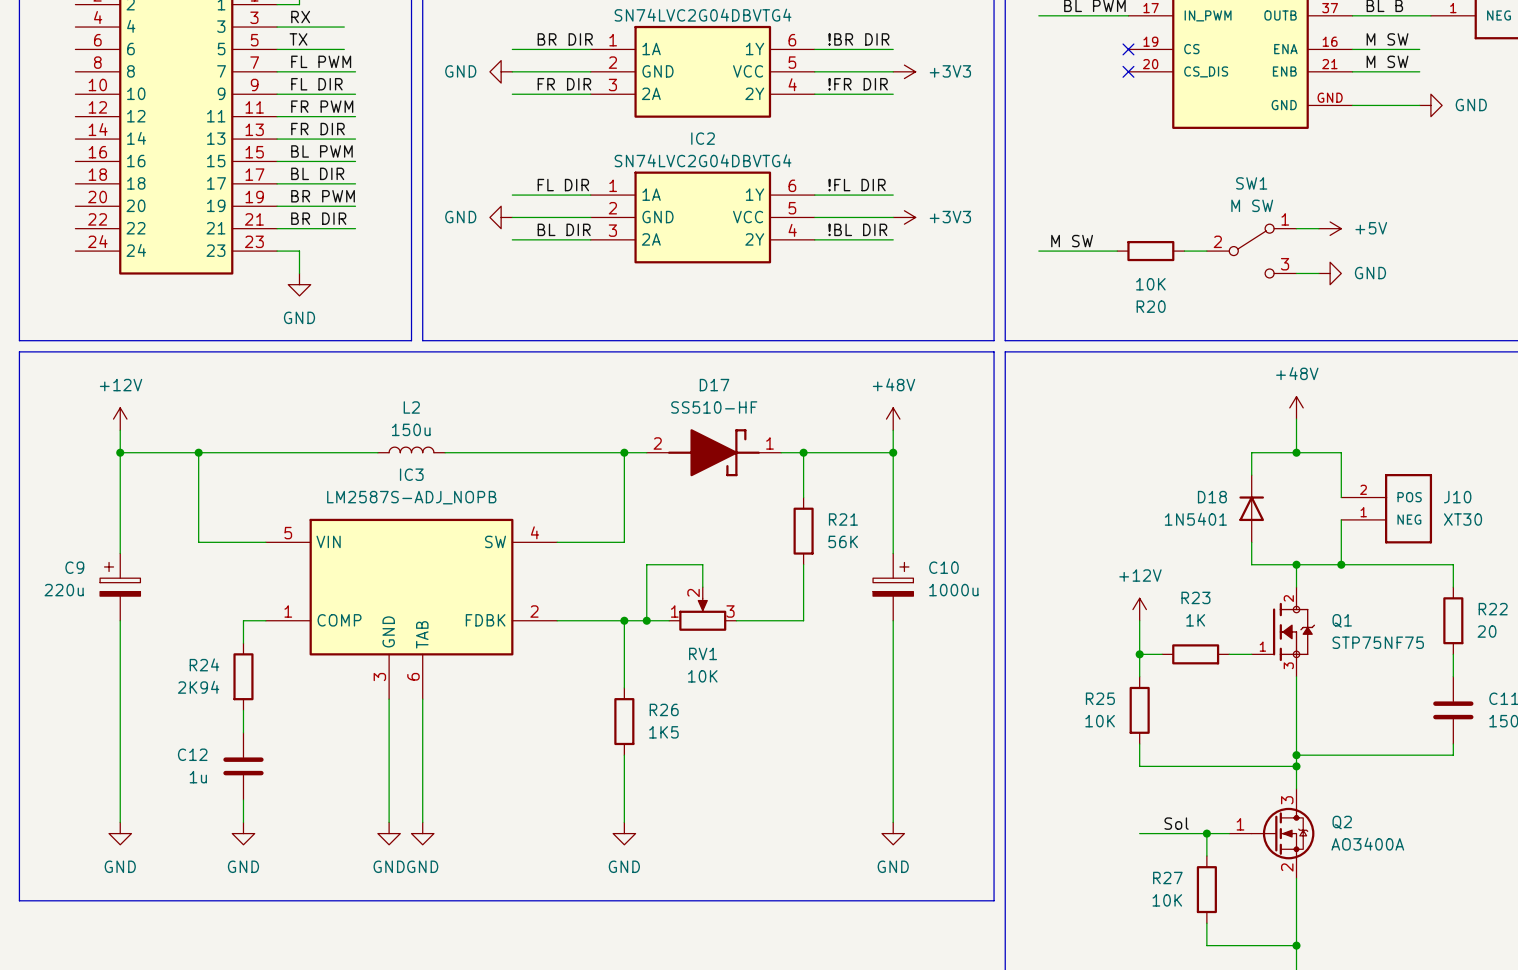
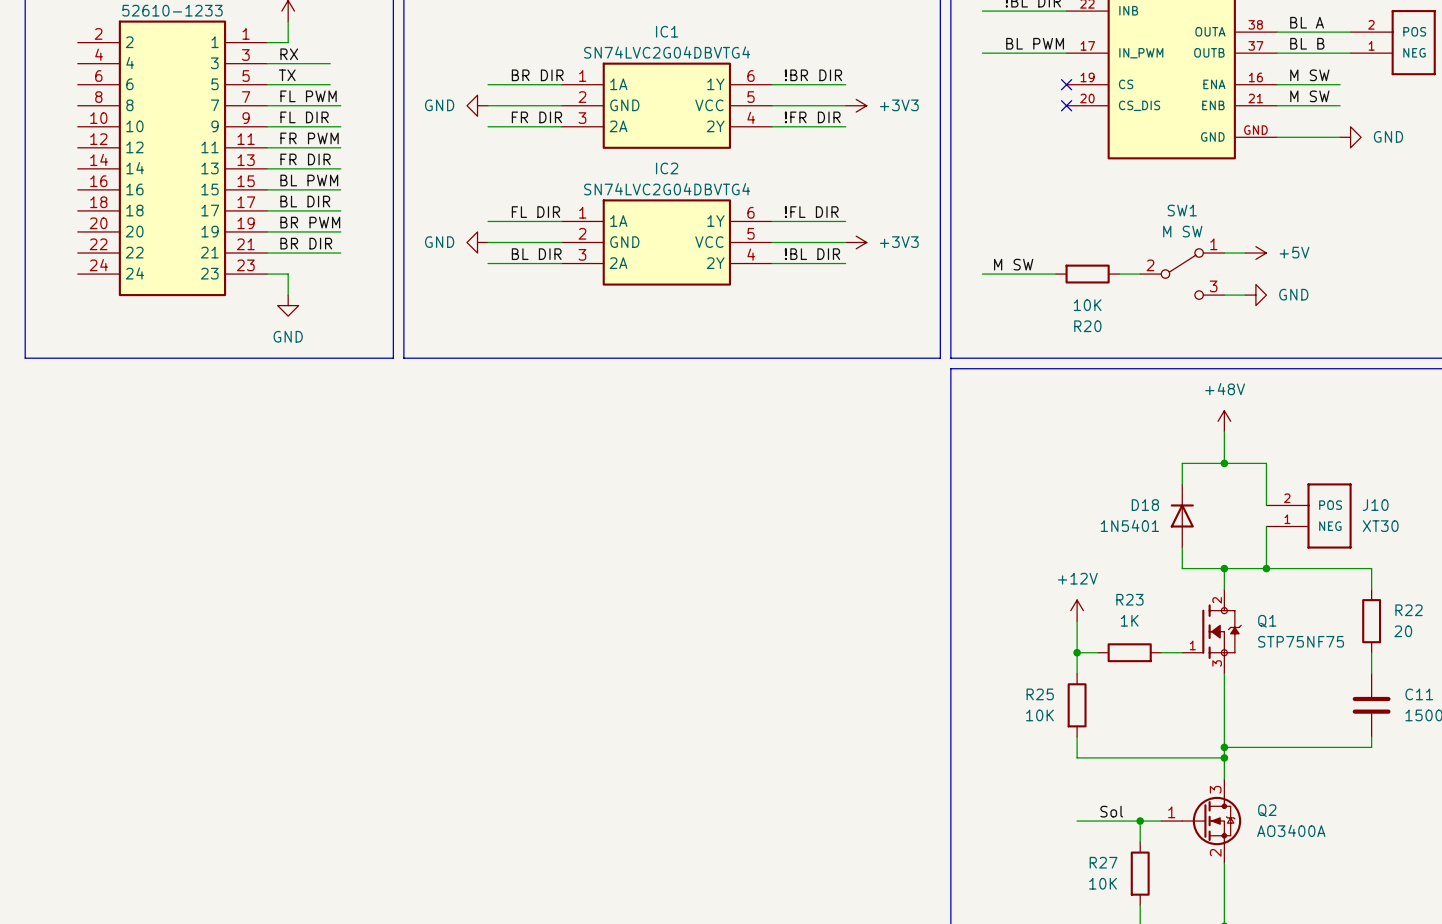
line: (19, 351) (994, 351) (994, 900) (19, 900) (19, 351) -> none
power symbol: +12V (120, 419) -> none
power symbol: +48V (893, 419) -> none
wire: (120, 430) (120, 553) -> none
wire: (893, 430) (893, 553) -> none
L2: 150u (411, 449) -> none
wire: (120, 452) (377, 452) -> none
junction: (120, 452) -> none
wire: (198, 452) (198, 542) (265, 542) -> none
junction: (198, 452) -> none
wire: (445, 452) (646, 452) -> none
wire: (624, 452) (624, 542) (557, 542) -> none
junction: (624, 452) -> none
D17: SS510-HF (713, 452) -> none
wire: (781, 452) (893, 452) -> none
wire: (803, 452) (803, 497) -> none
junction: (803, 452) -> none
junction: (893, 452) -> none
R21: 56K (803, 531) -> none
wire: (803, 564) (803, 620) (736, 620) -> none
C9: 220u (120, 587) -> none
wire: (702, 587) (702, 564) (646, 564) (646, 620) -> none
C10: 1000u (893, 587) -> none
IC3: LM2587S-ADJ_NOPB (411, 608) -> none
RV1: 10K (702, 608) -> none
wire: (120, 620) (120, 822) -> none
wire: (265, 620) (243, 620) (243, 643) -> none
wire: (557, 620) (669, 620) -> none
wire: (624, 620) (624, 687) -> none
junction: (624, 620) -> none
junction: (646, 620) -> none
wire: (893, 620) (893, 822) -> none
R24: 2K94 (243, 676) -> none
wire: (389, 699) (389, 822) -> none
wire: (422, 699) (422, 822) -> none
wire: (243, 710) (243, 732) -> none
R26: 1K5 (624, 721) -> none
wire: (624, 755) (624, 822) -> none
C12: 1u (243, 766) -> none
wire: (243, 799) (243, 822) -> none
power symbol: GND (120, 833) -> none
power symbol: GND (243, 833) -> none
power symbol: GND (389, 833) -> none
power symbol: GND (422, 833) -> none
power symbol: GND (624, 833) -> none
power symbol: GND (893, 833) -> none

